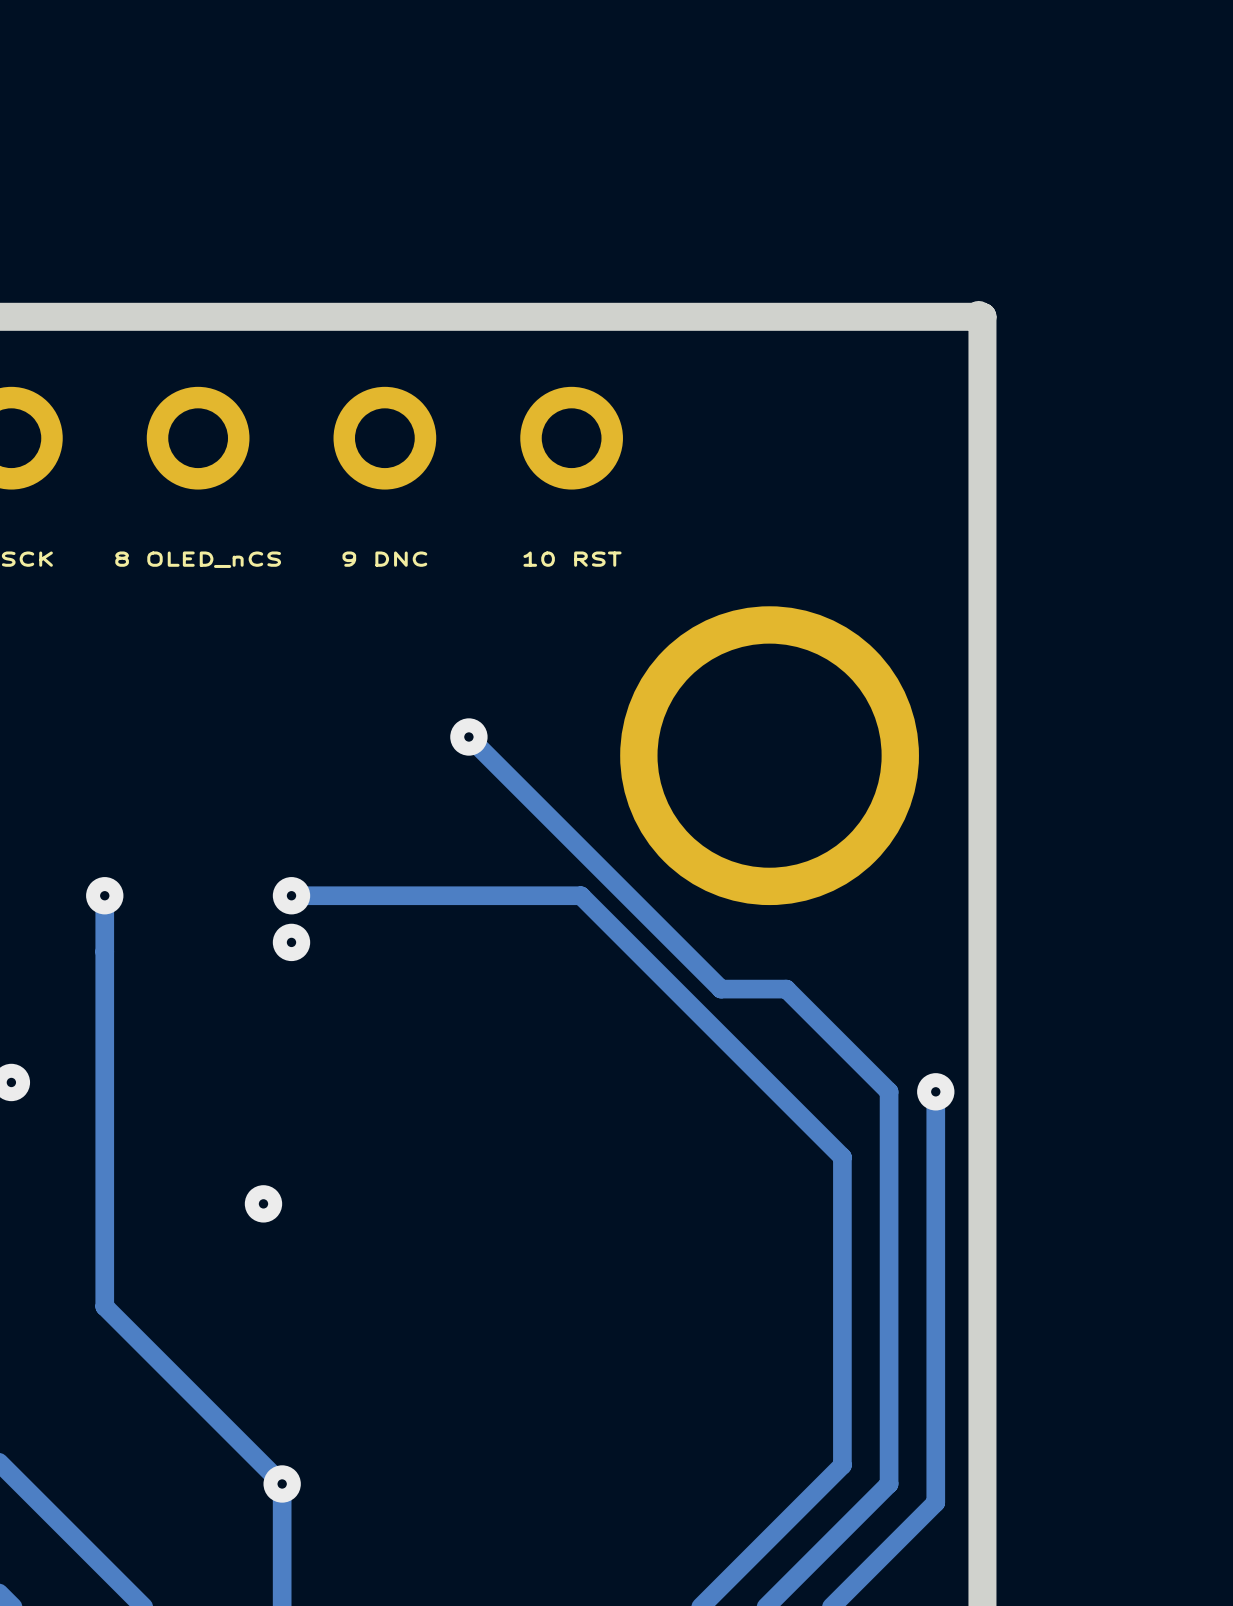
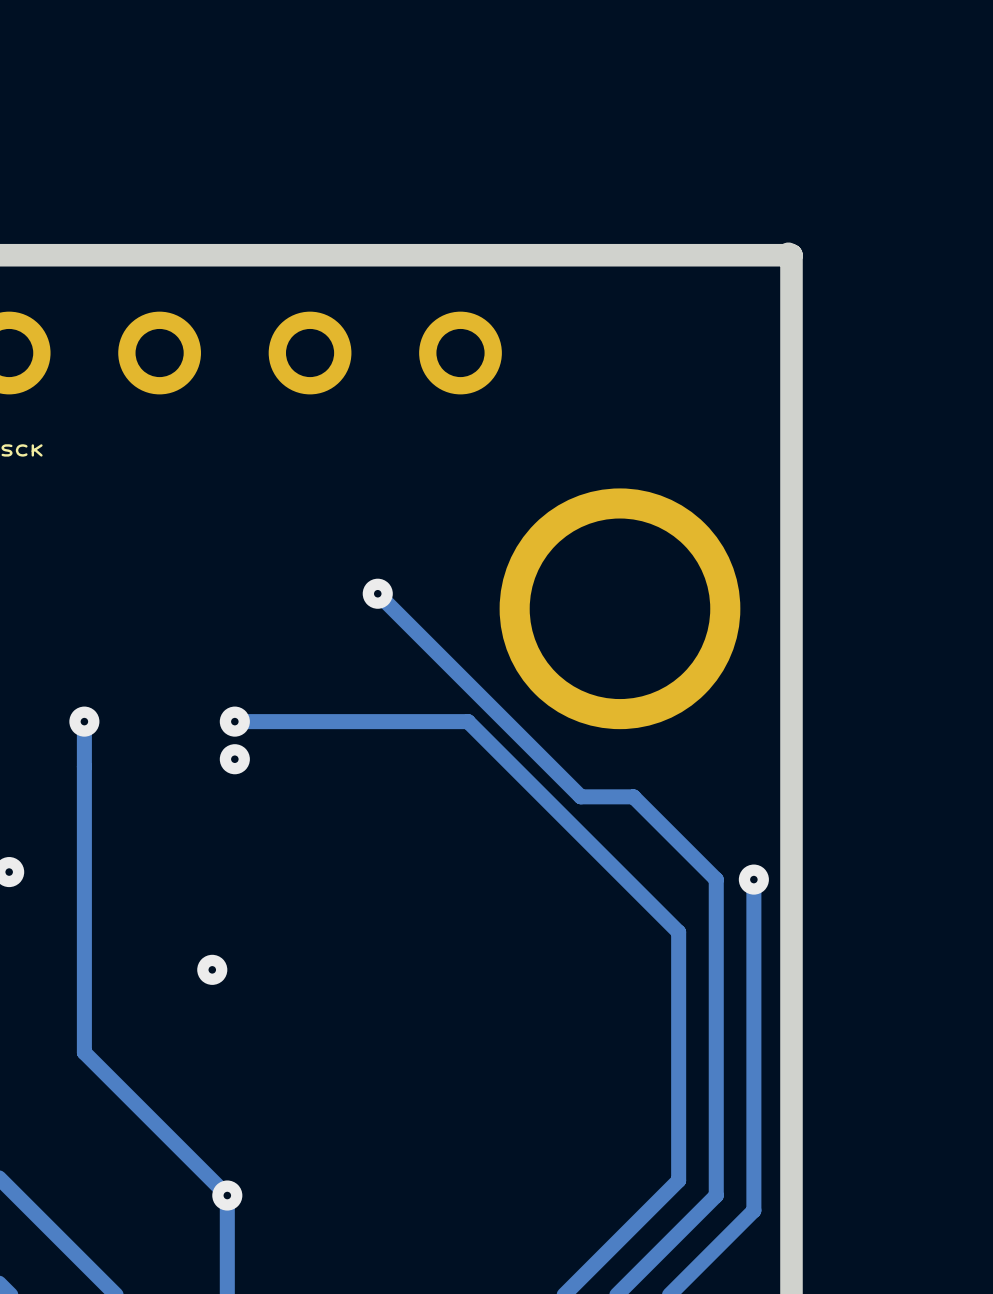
text: 8 OLED_nCS (198, 559) -> none
text: 9 DNC (384, 559) -> none
text: 10 RST (572, 559) -> none

